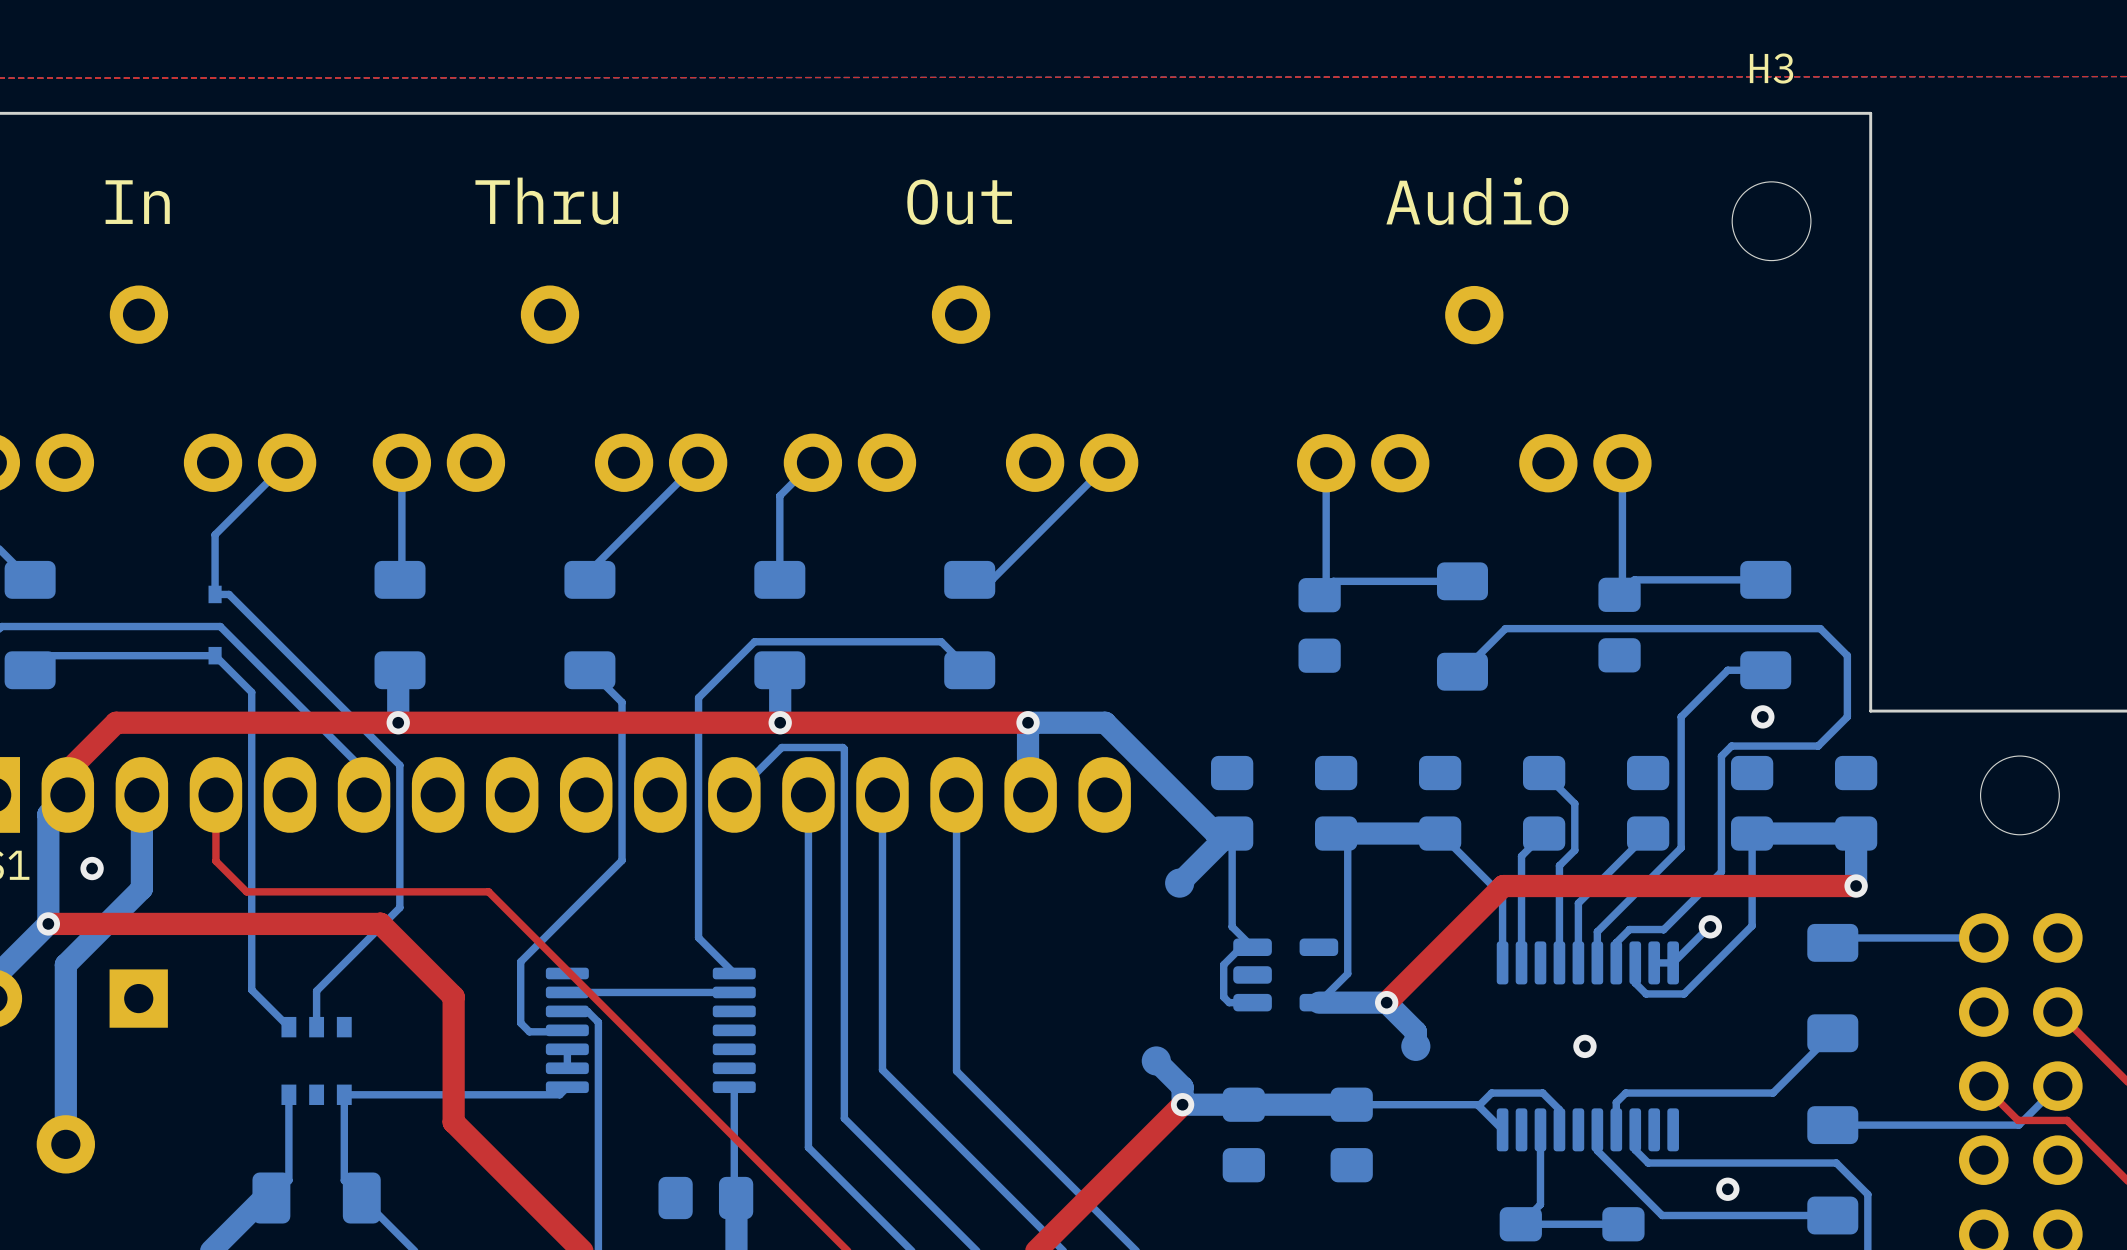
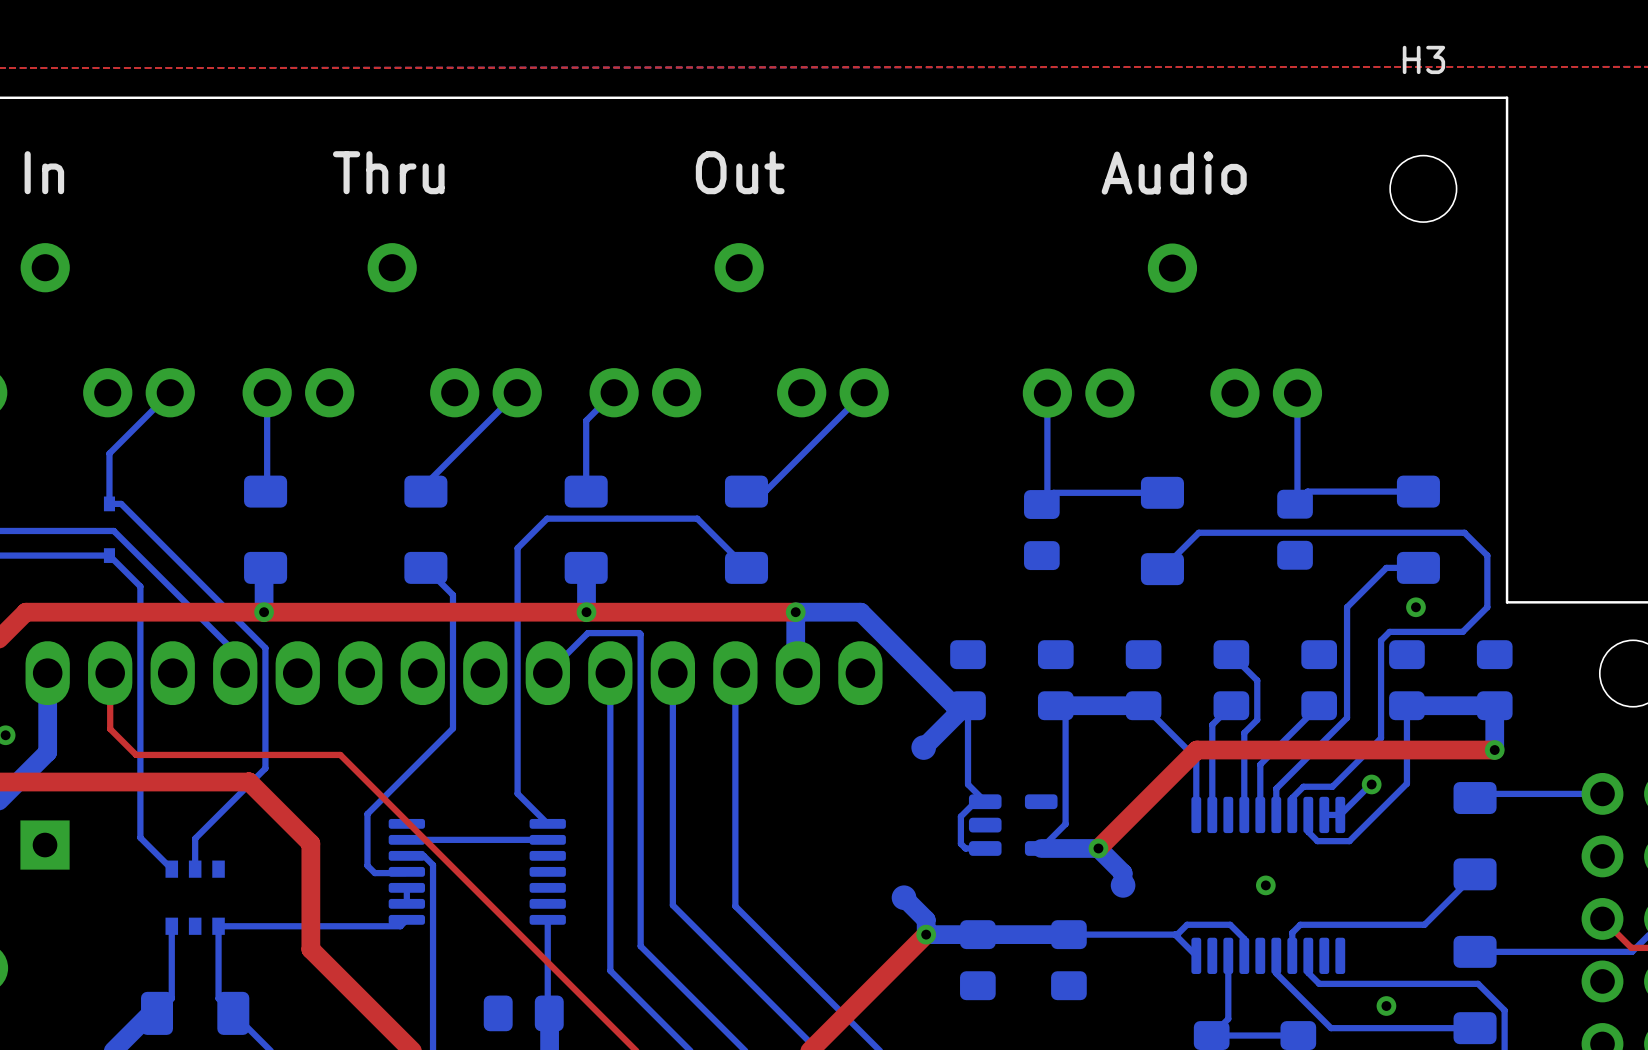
bottom track: (941, 641) (754, 641) (698, 697) -> (722, 543) (697, 518) (547, 518) (517, 548) (517, 591)

